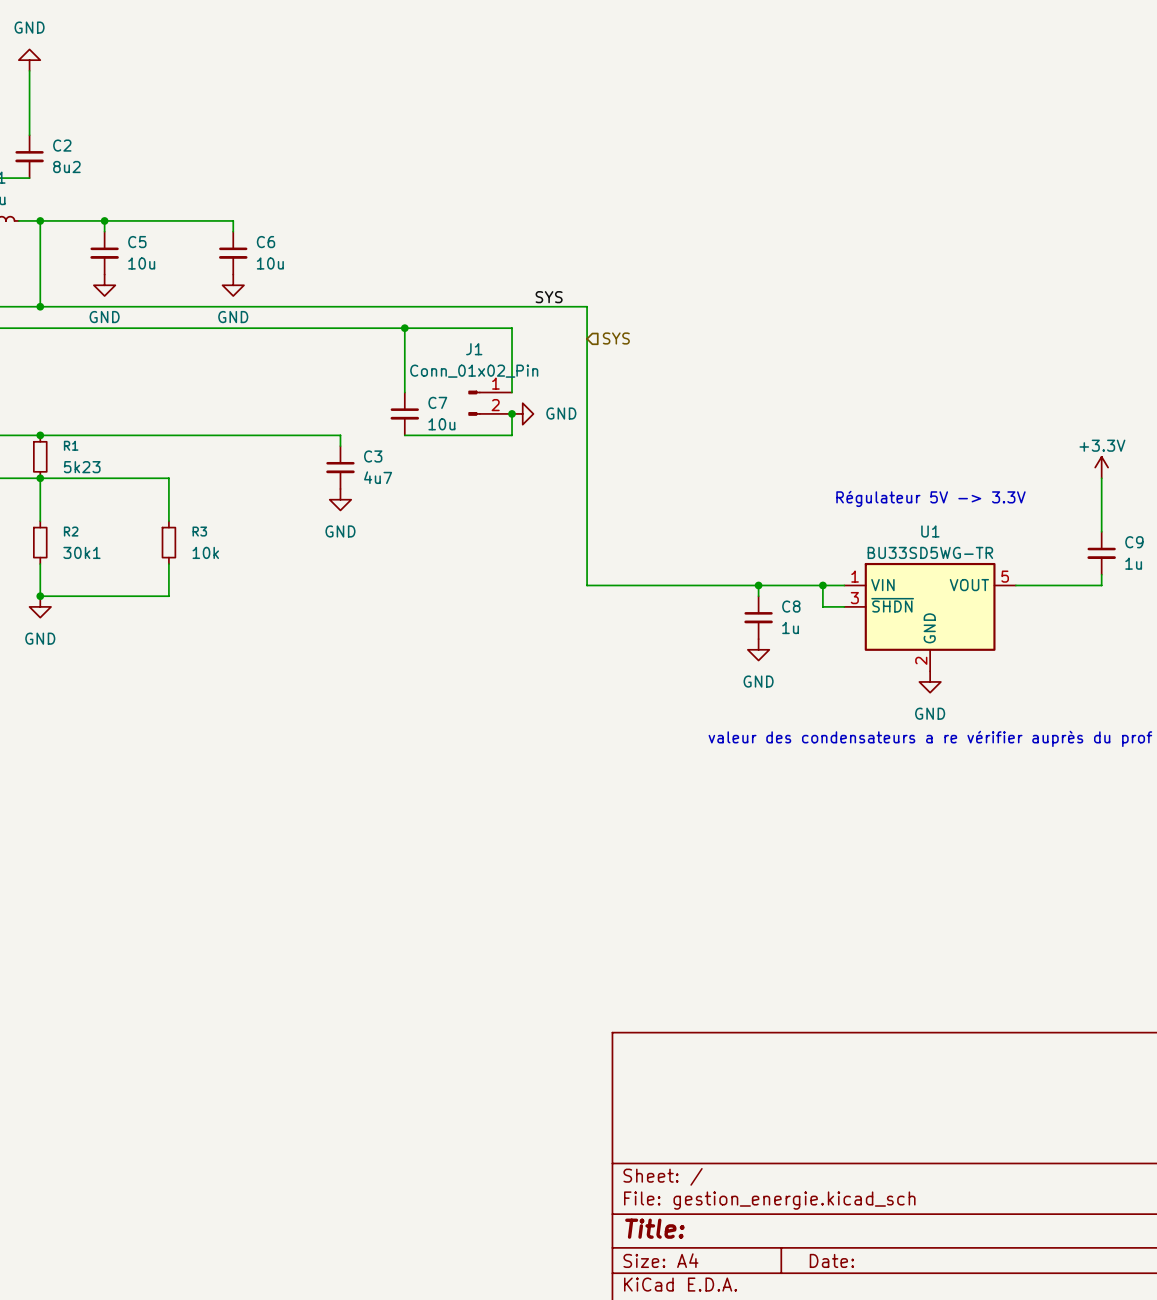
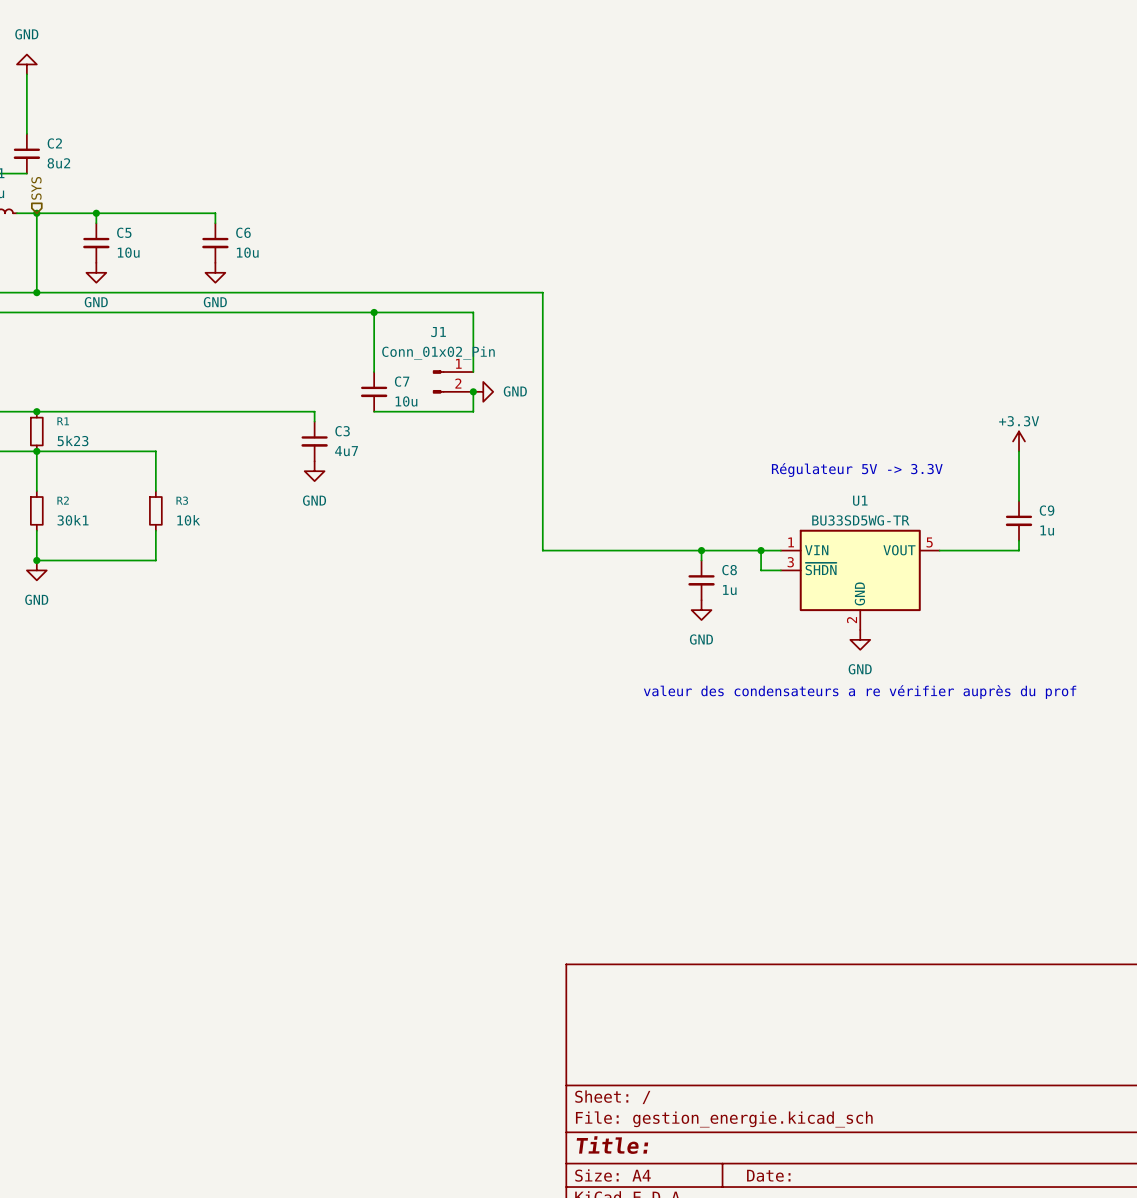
hierarchical label: none -> SYS (36, 188)
label: SYS (549, 297) -> none
hierarchical label: SYS (616, 338) -> none

